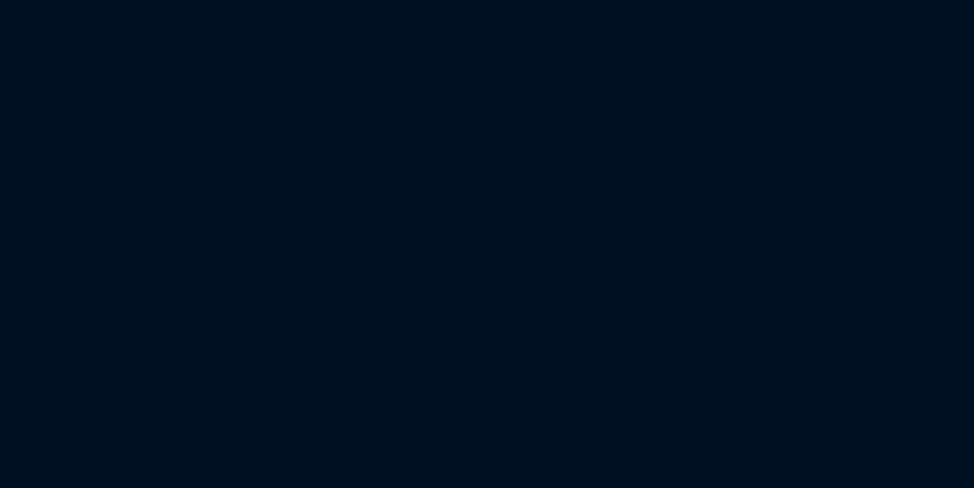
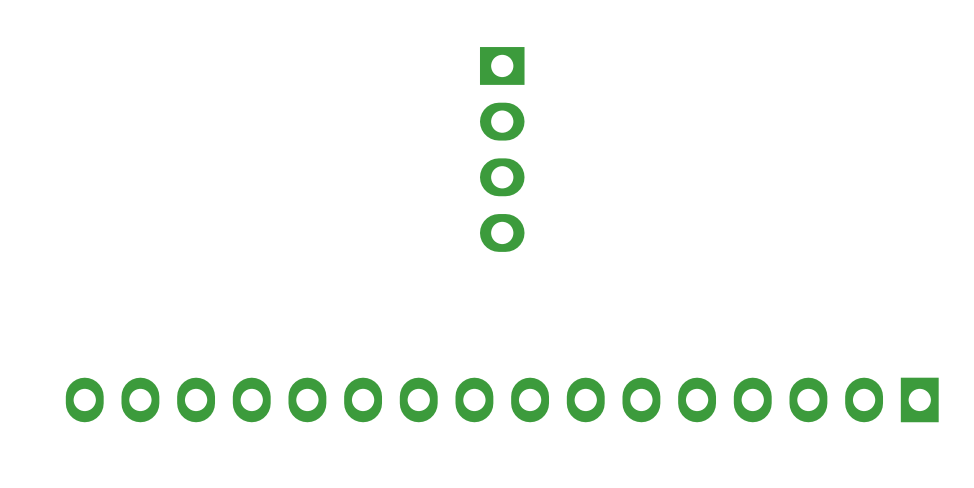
part: none -> (502, 149)
part: none -> (502, 399)

